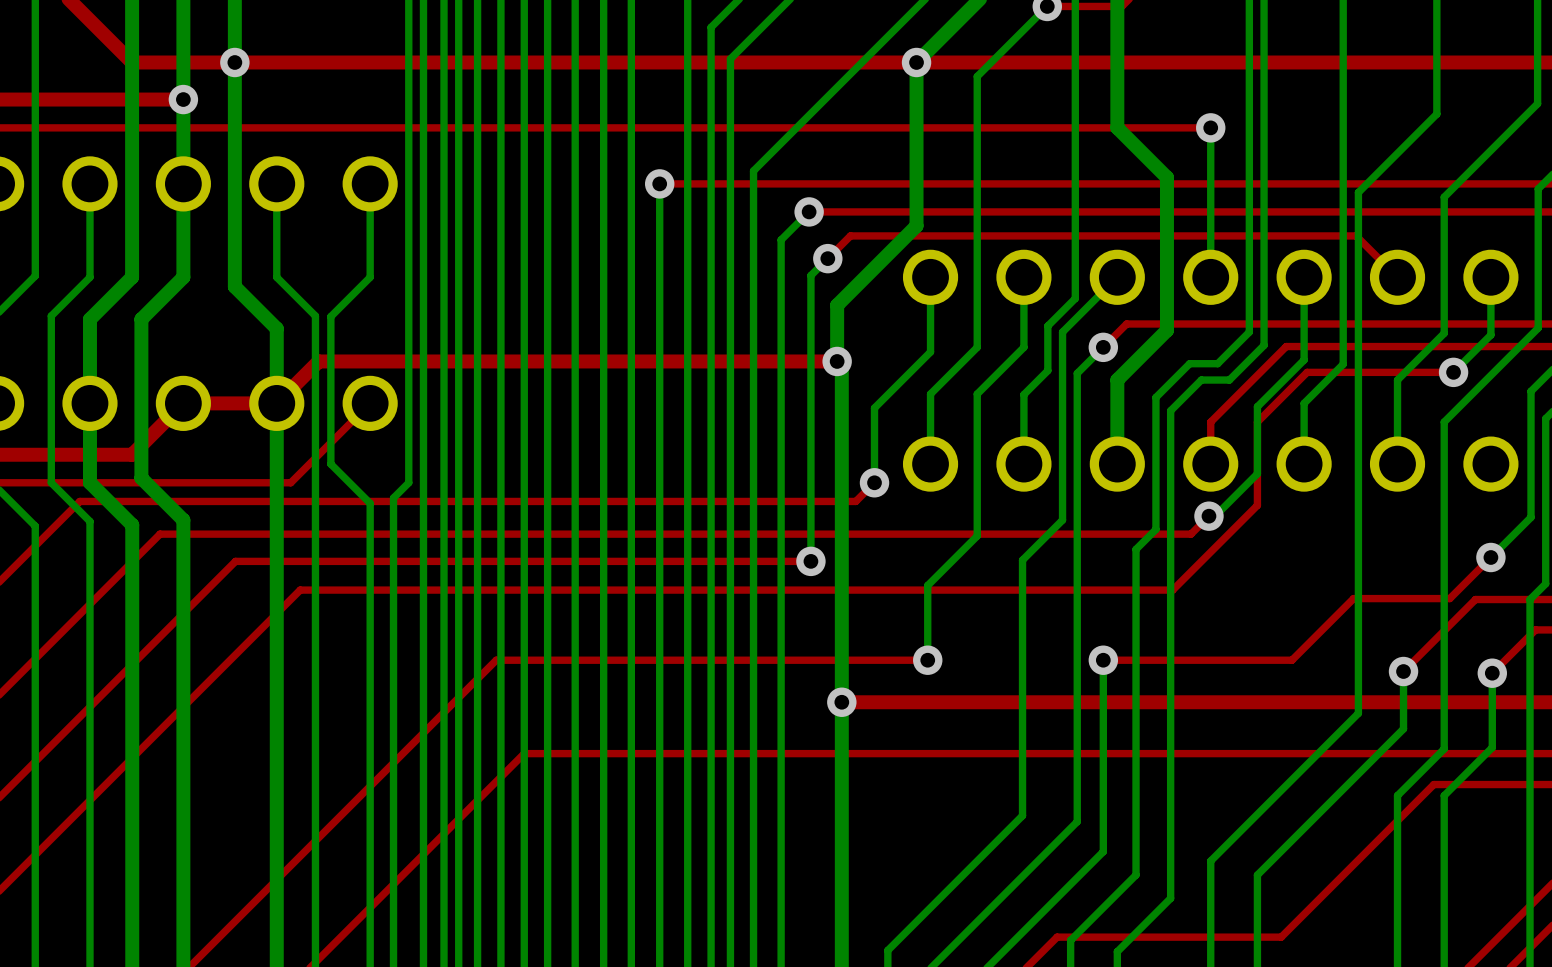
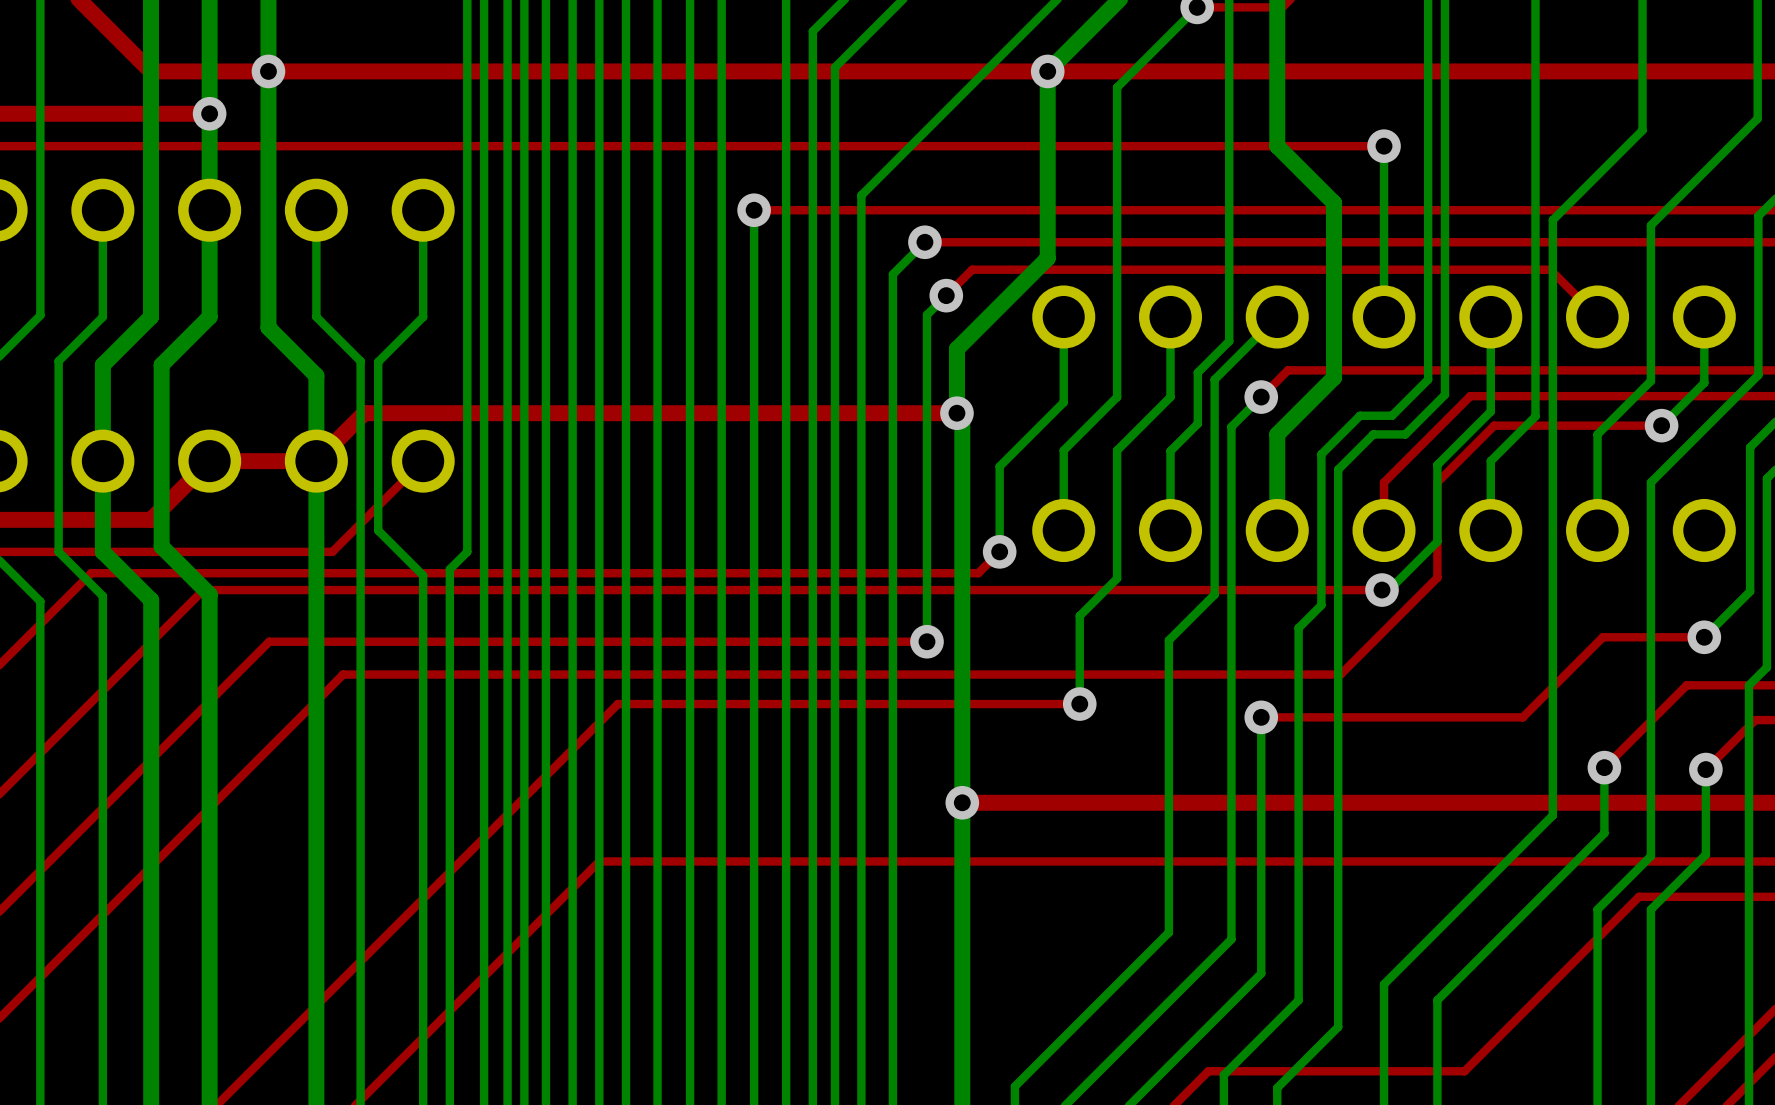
bottom track: (977, 506) (977, 536) (927, 585) (927, 660) -> (1117, 578) (1079, 615) (1079, 704)
top track: (1208, 516) (1191, 534) (160, 534) -> (1382, 590) (203, 590) (182, 610)
top track: (1490, 557) (1449, 598) (1353, 598) (1291, 660) (1103, 660) -> (1704, 637) (1602, 637) (1522, 717) (1261, 717)
top track: (927, 660) (496, 660) -> (1079, 704) (617, 704) (567, 754)
via position: (927, 660) -> (1079, 704)
via position: (1103, 660) -> (1261, 717)

